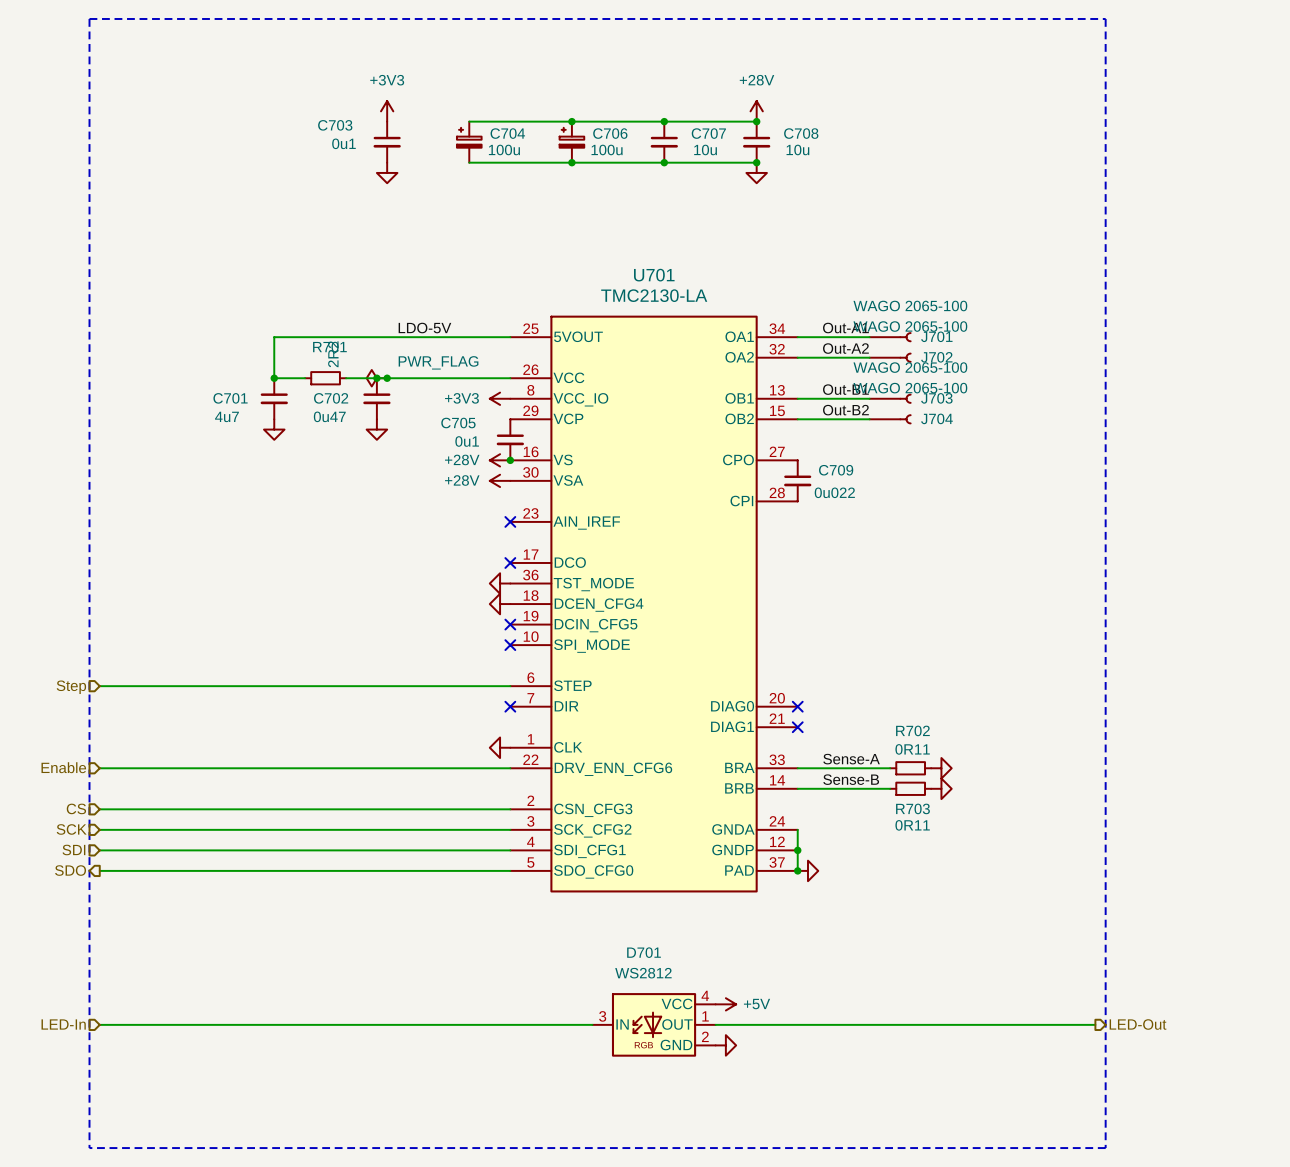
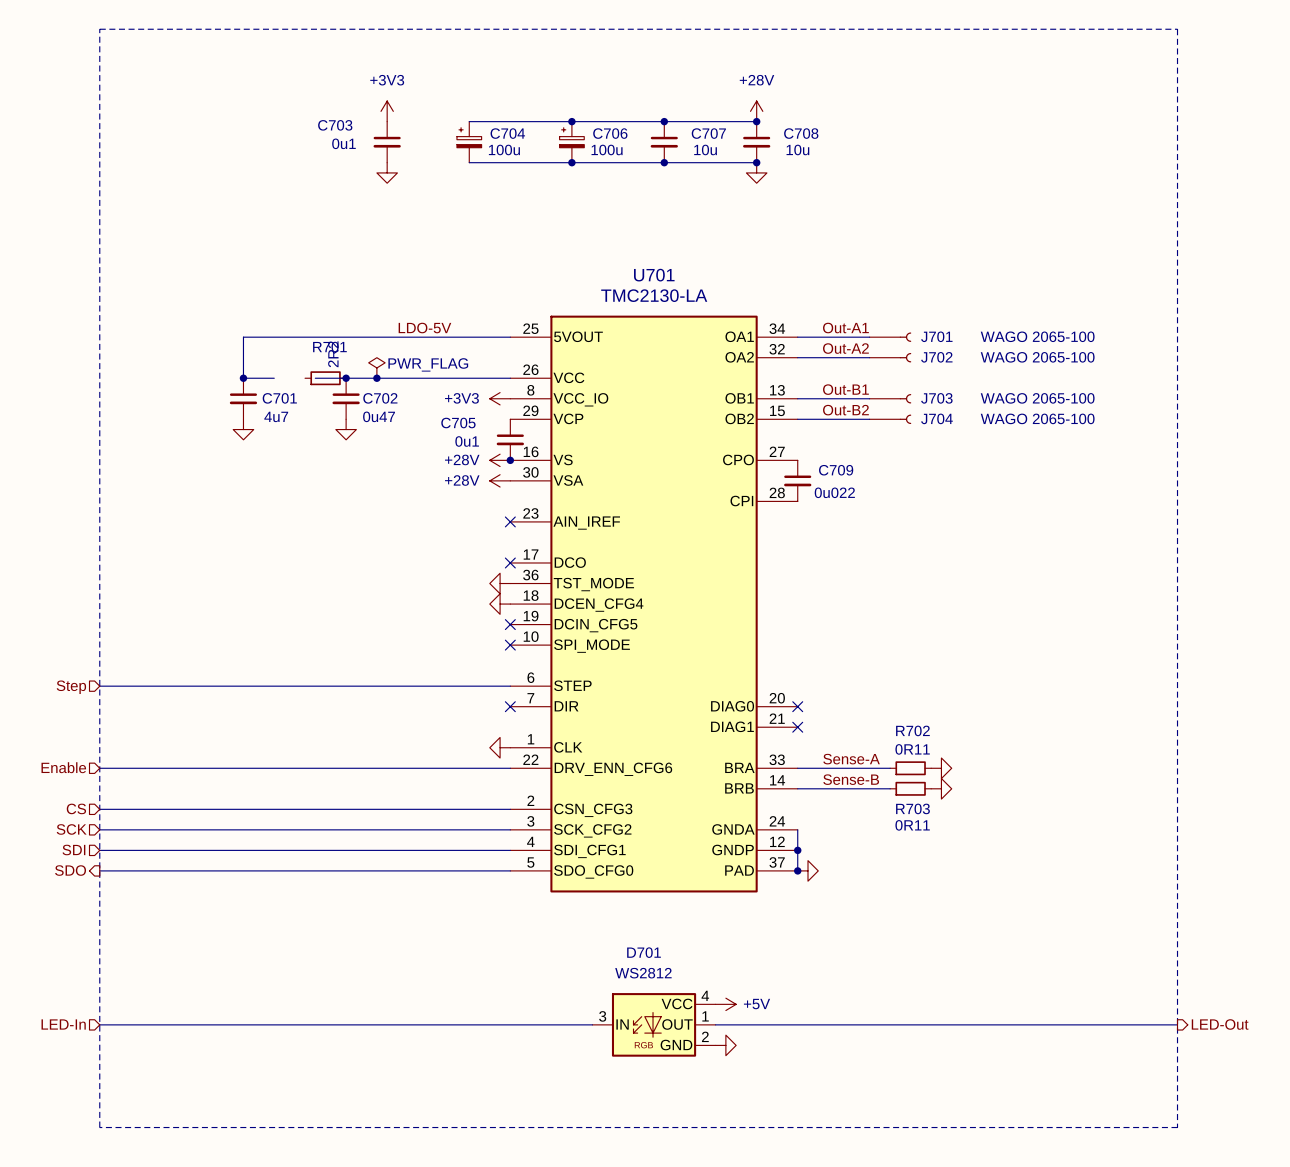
line: (89, 18) (1105, 18) (1105, 1148) (89, 1148) (89, 18) -> (99, 29) (99, 1127) (1177, 1127) (1177, 29) (99, 29)
J701 value position: WAGO 2065-100 (910, 306) -> WAGO 2065-100 (1037, 336)
J702 value position: WAGO 2065-100 (910, 326) -> WAGO 2065-100 (1037, 357)
wire: (274, 337) (274, 378) (305, 378) -> (274, 337) (243, 337) (243, 378) (274, 378)
J703 value position: WAGO 2065-100 (910, 367) -> WAGO 2065-100 (1037, 398)
junction position: (274, 378) -> (243, 378)
wire: none -> (315, 378) (346, 378)
junction: none -> (346, 378)
power symbol rotation: 0° (376, 378) -> 90° clockwise (376, 367)
junction: (387, 378) -> none
J704 value position: WAGO 2065-100 (910, 388) -> WAGO 2065-100 (1037, 418)
C701 name position: C701 (230, 398) -> C701 (279, 398)
C701 position: (274, 398) -> (243, 398)
C702 name position: C702 (331, 398) -> C702 (380, 398)
C702 position: (376, 398) -> (346, 398)
C701 value position: 4u7 (226, 416) -> 4u7 (276, 416)
C702 value position: 0u47 (329, 416) -> 0u47 (379, 416)
power symbol position: (274, 429) -> (243, 429)
power symbol position: (376, 429) -> (346, 429)
wire: none -> (1095, 1024) (1177, 1024)
hierarchical label position: LED-Out (1138, 1024) -> LED-Out (1220, 1024)

